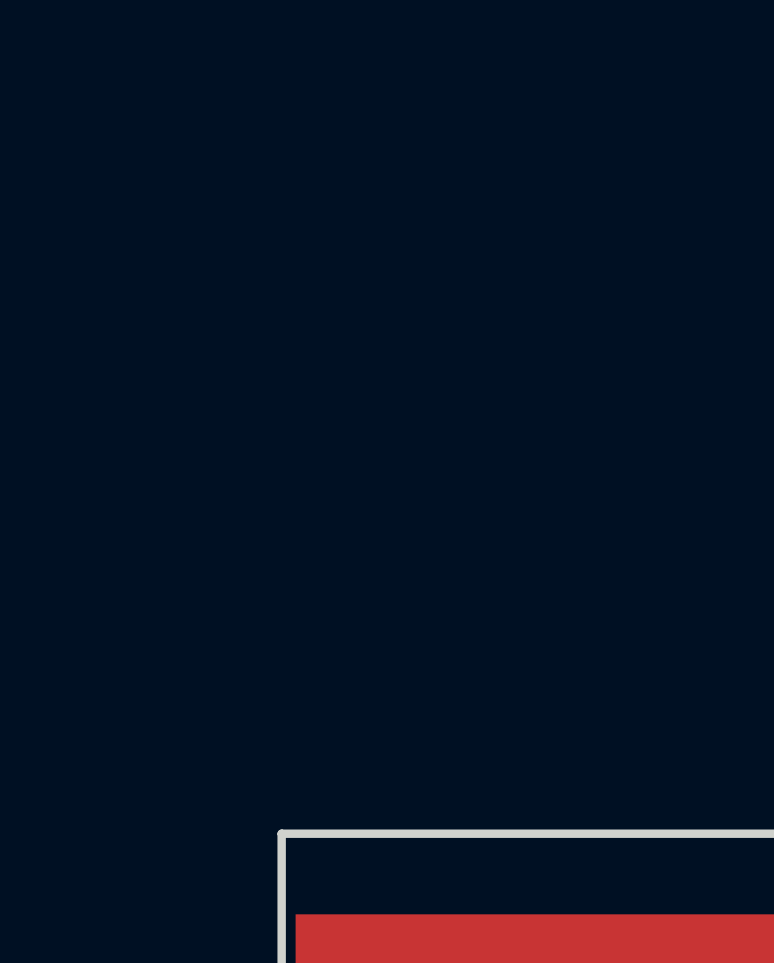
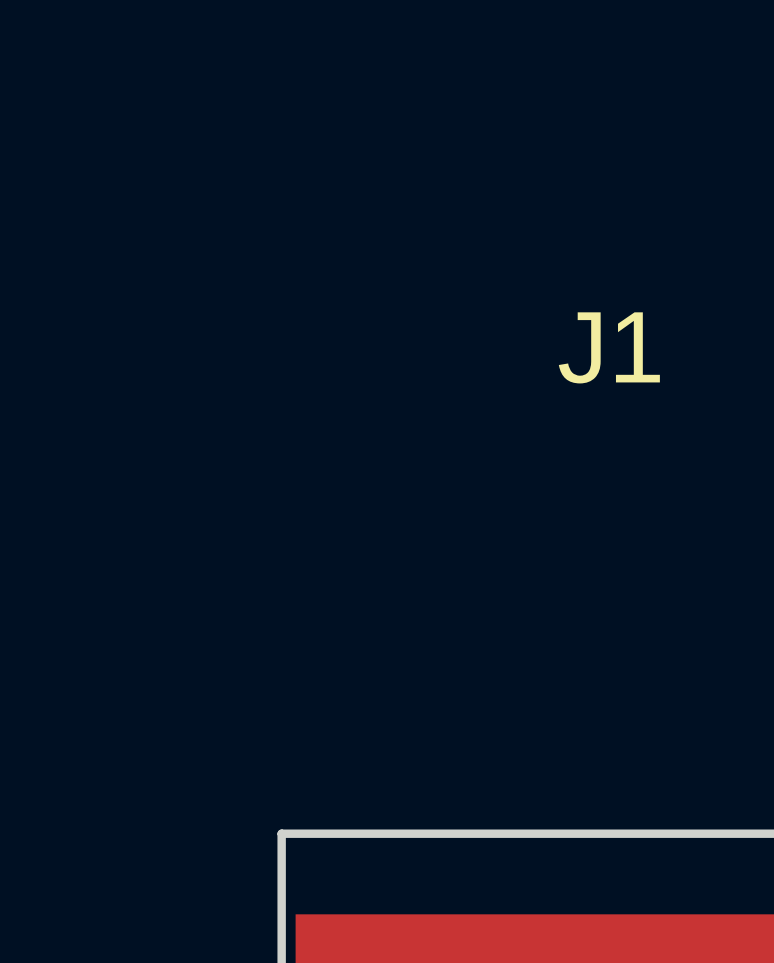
J1 name: none -> J1 (609, 347)

